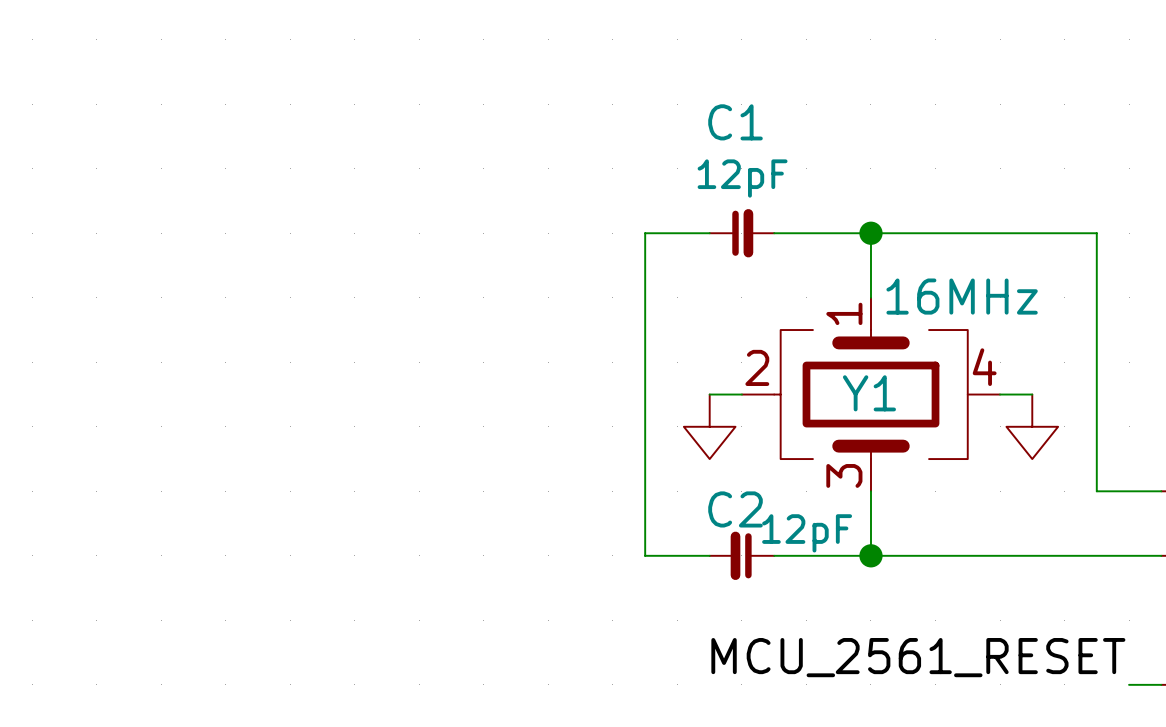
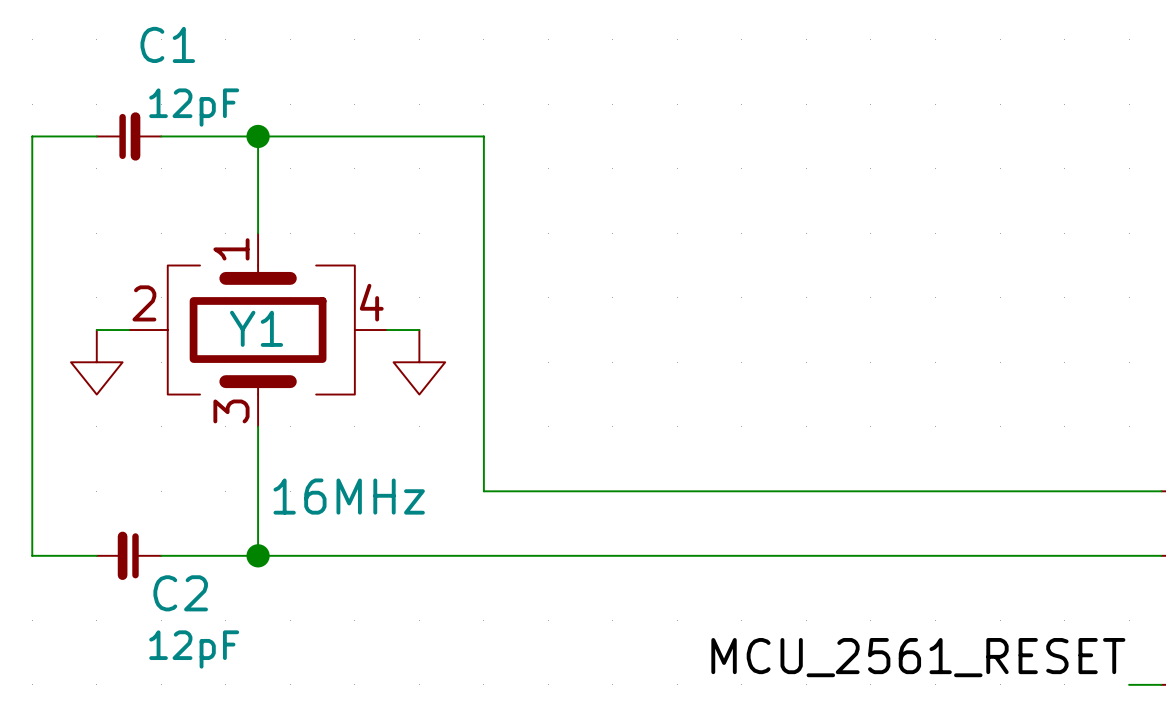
C1 name position: C1 (735, 122) -> C1 (167, 44)
wire: none -> (96, 136) (32, 136) (32, 555) (96, 555)
wire: none -> (258, 136) (258, 233)
junction: none -> (258, 136)
C1 value position: 12pF (742, 178) -> 12pF (194, 107)
wire: (709, 233) (645, 233) (645, 555) -> (161, 555) (645, 555)
C1 position: (741, 233) -> (129, 136)
wire: (774, 233) (1096, 233) (1096, 491) -> (161, 136) (483, 136) (483, 491) (1096, 491)
wire: (870, 233) (870, 297) -> none
junction: (870, 233) -> none
Y1 value position: 16MHz (962, 296) -> 16MHz (349, 496)
power symbol: none -> (96, 362)
power symbol: none -> (419, 362)
wire: (709, 394) (741, 394) -> (96, 330) (129, 330)
Y1 position: (870, 394) -> (258, 330)
wire: (1000, 394) (1032, 394) -> (387, 330) (419, 330)
wire: none -> (258, 426) (258, 555)
power symbol: (709, 426) -> none
power symbol: (1032, 426) -> none
wire: (870, 491) (870, 555) -> none
C2 name position: C2 (735, 509) -> C2 (180, 593)
C2 value position: 12pF (807, 533) -> 12pF (194, 649)
junction: none -> (258, 555)
C2 position: (741, 555) -> (129, 555)
junction: (870, 555) -> none

